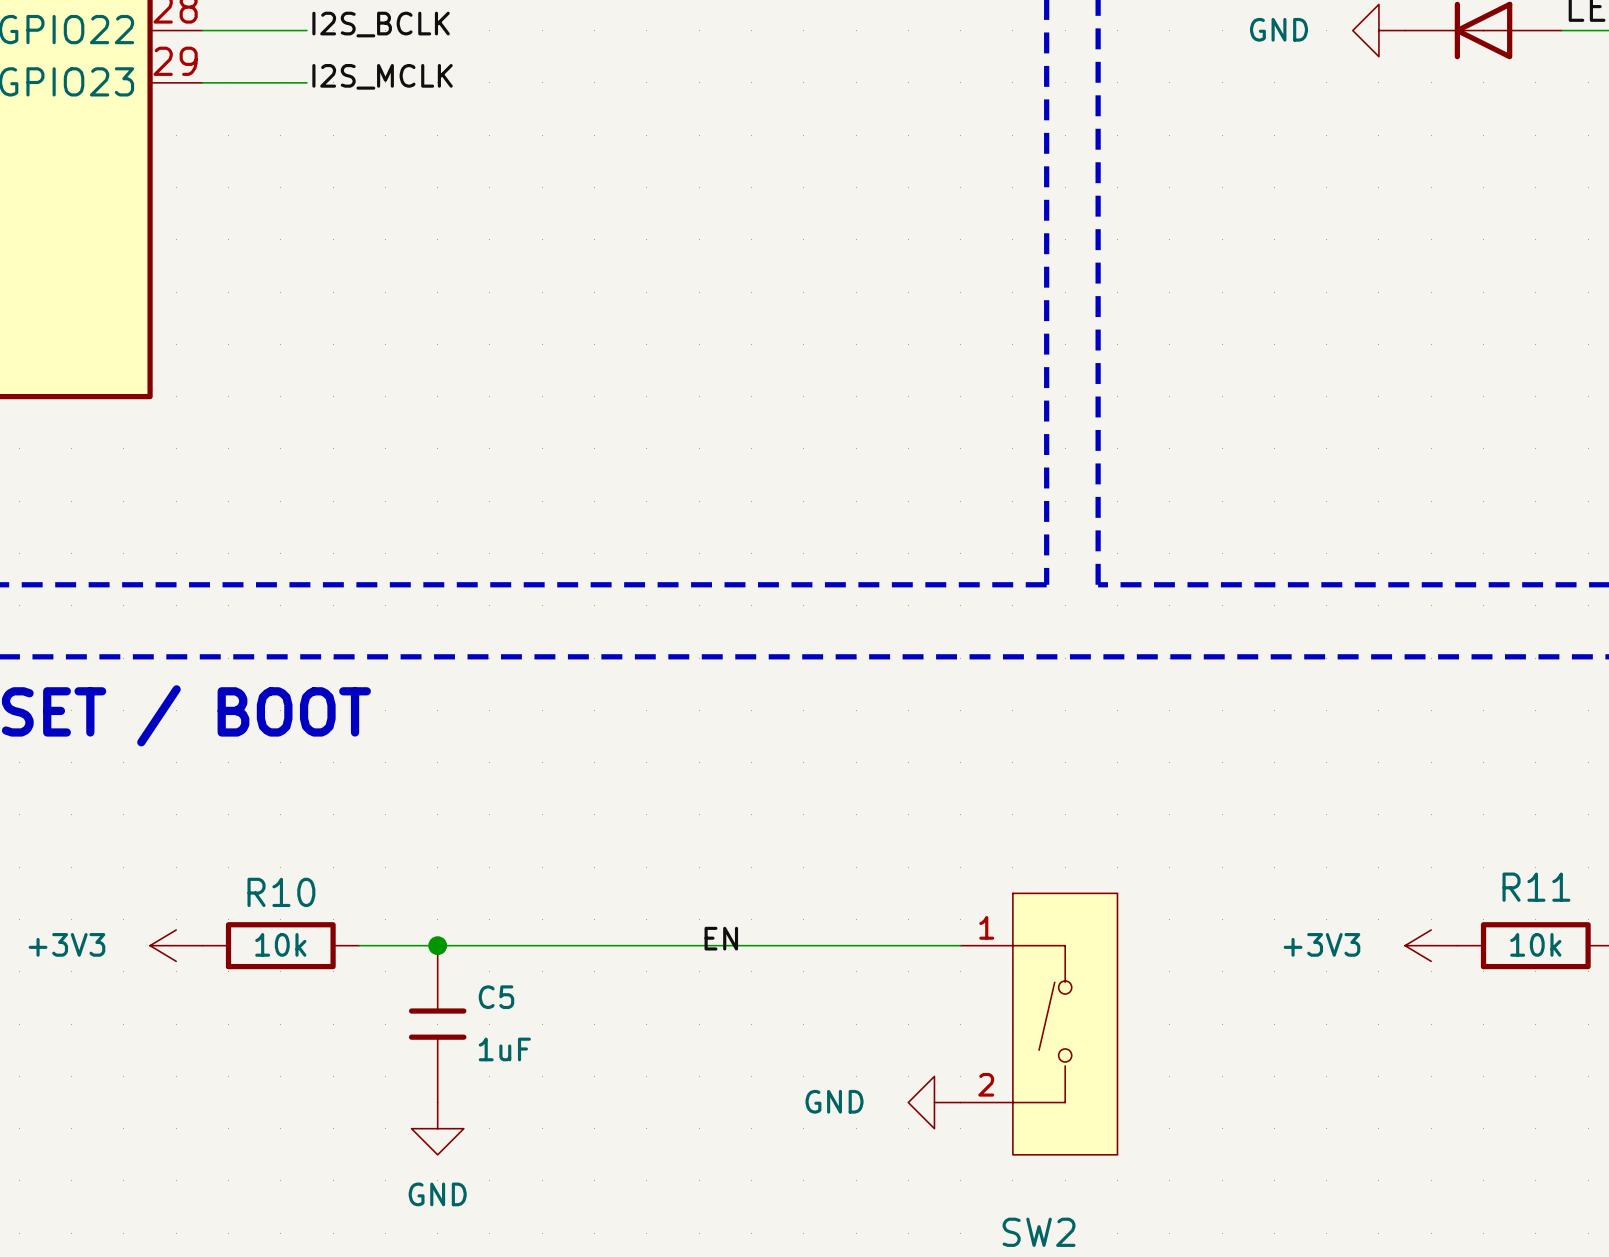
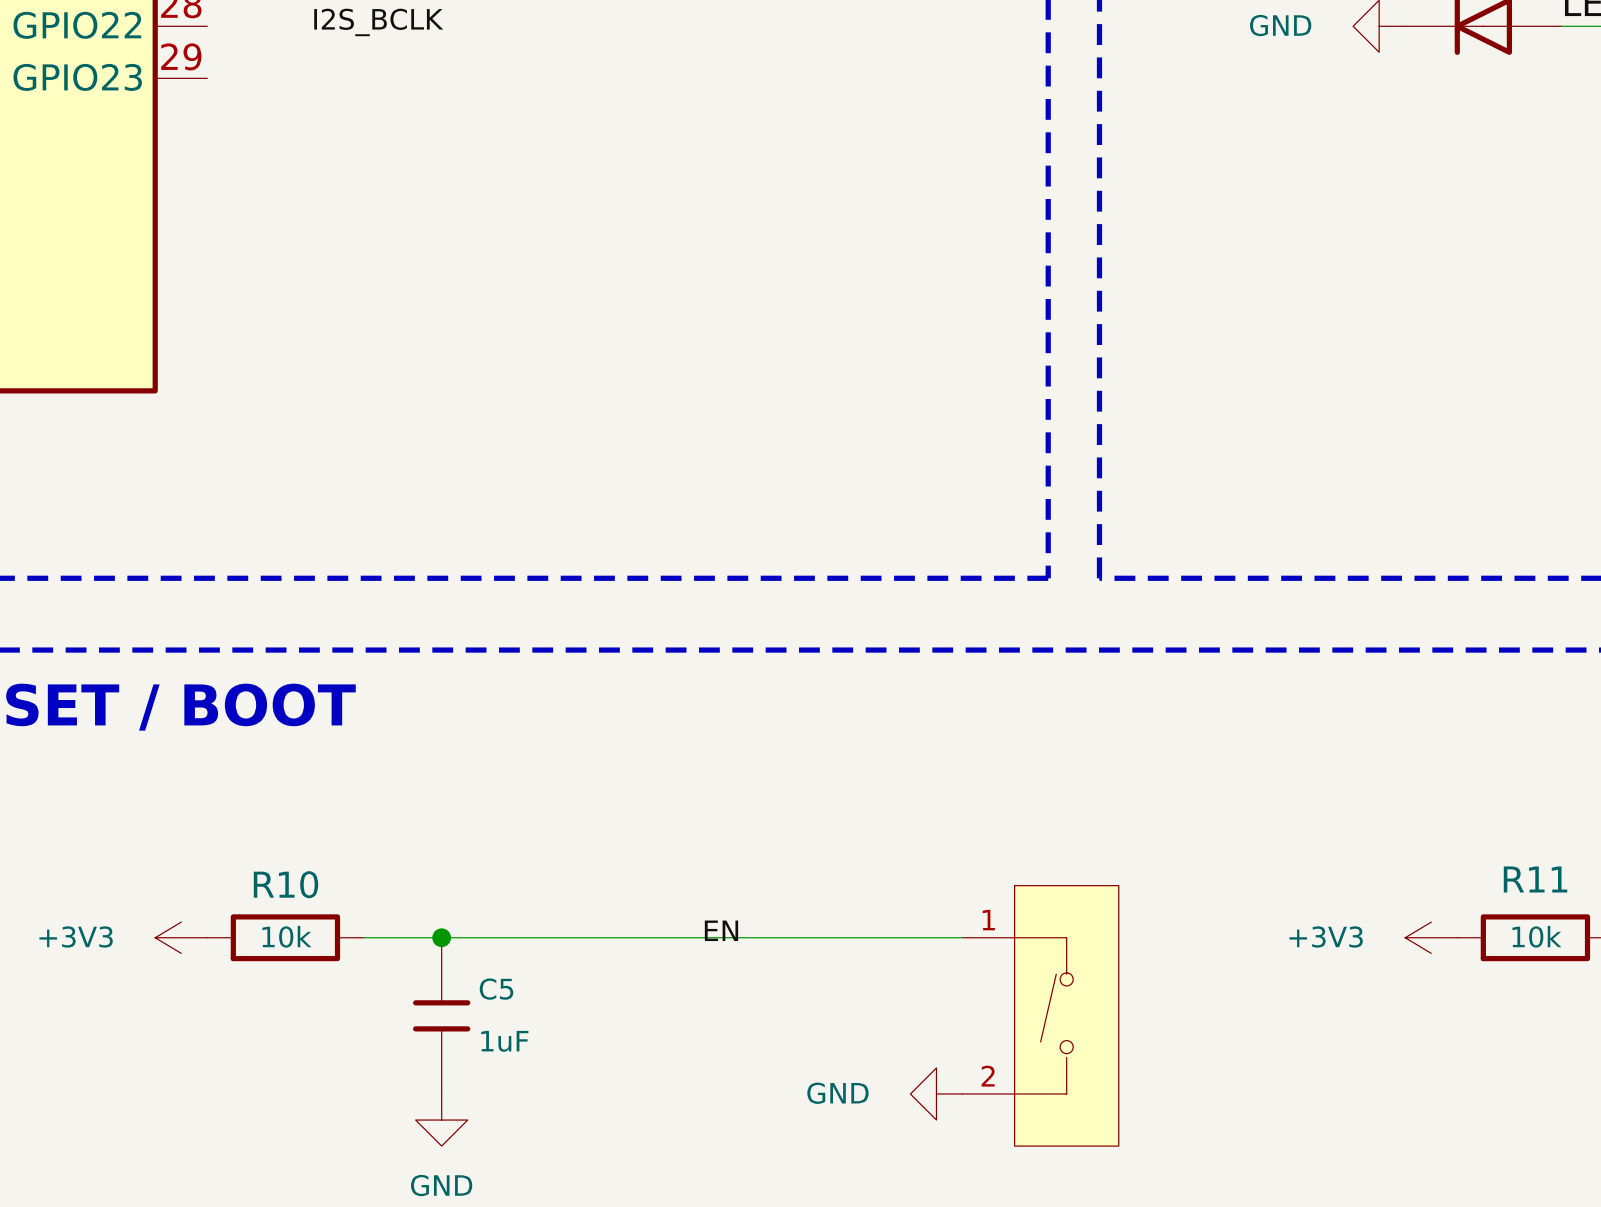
wire: (202, 30) (306, 30) -> none
label: I2S_MCLK (382, 76) -> none
wire: (202, 82) (306, 82) -> none

